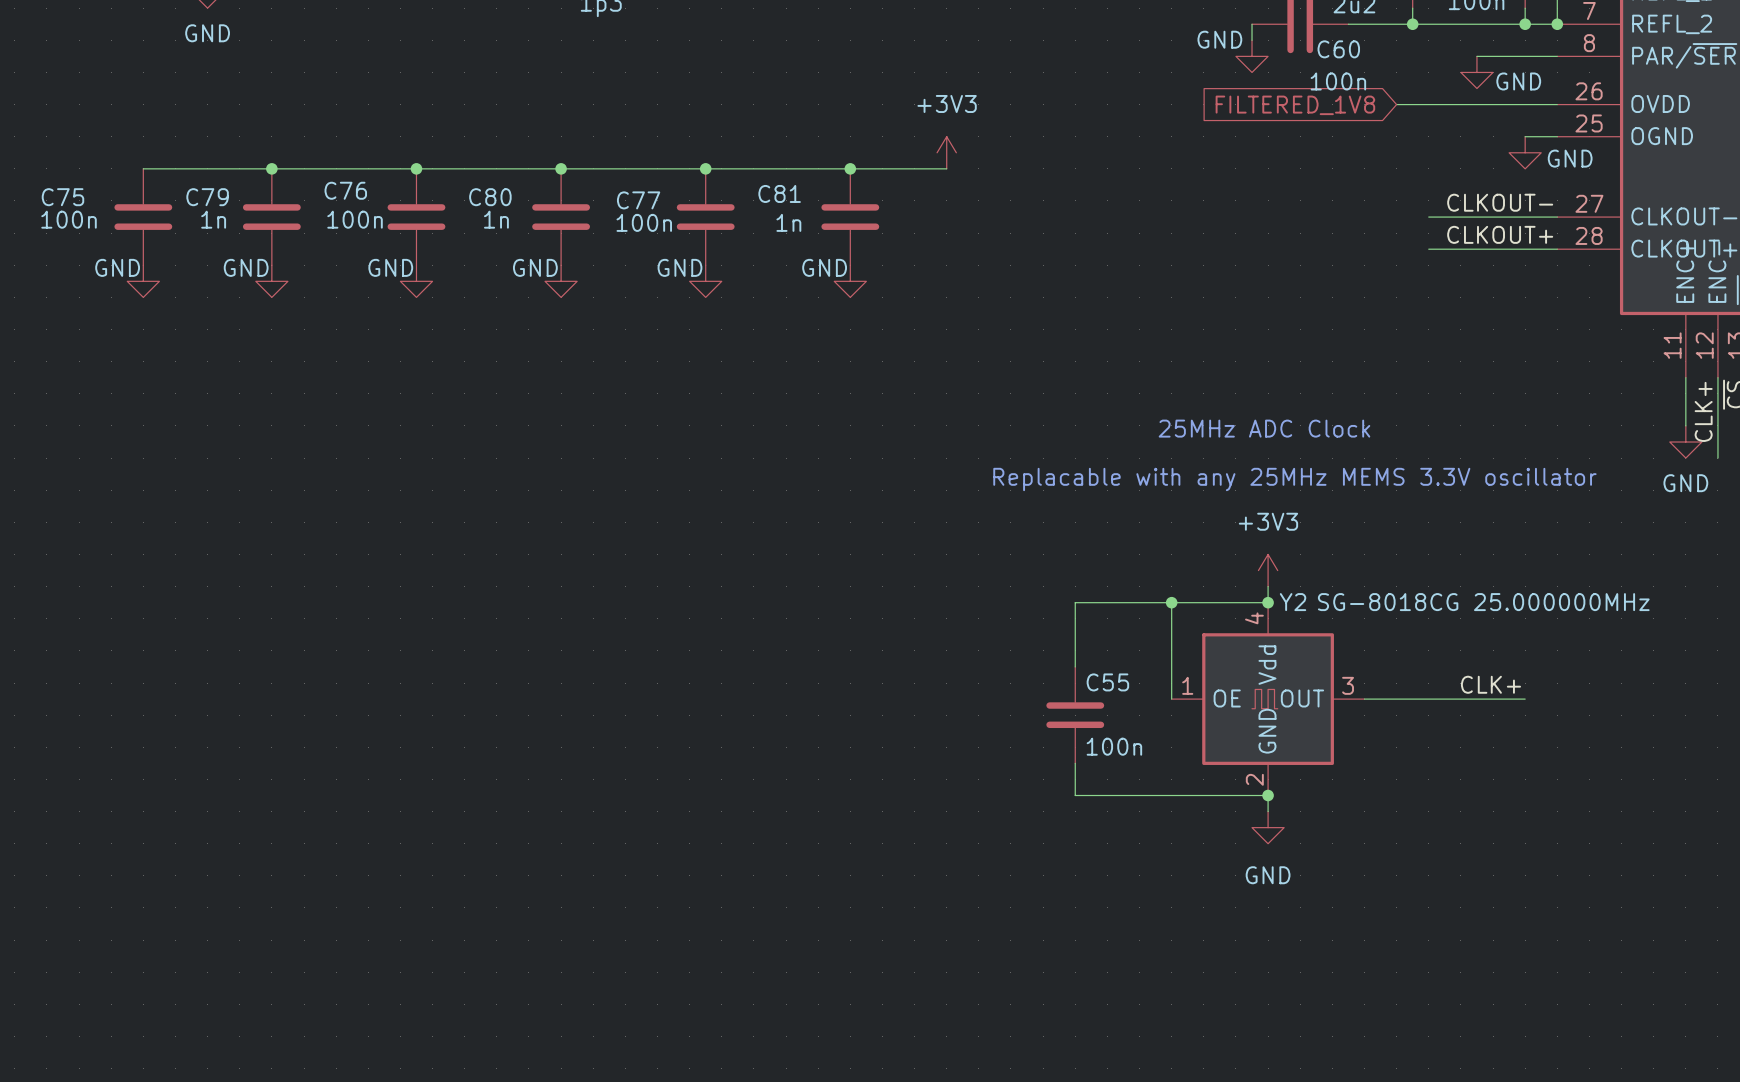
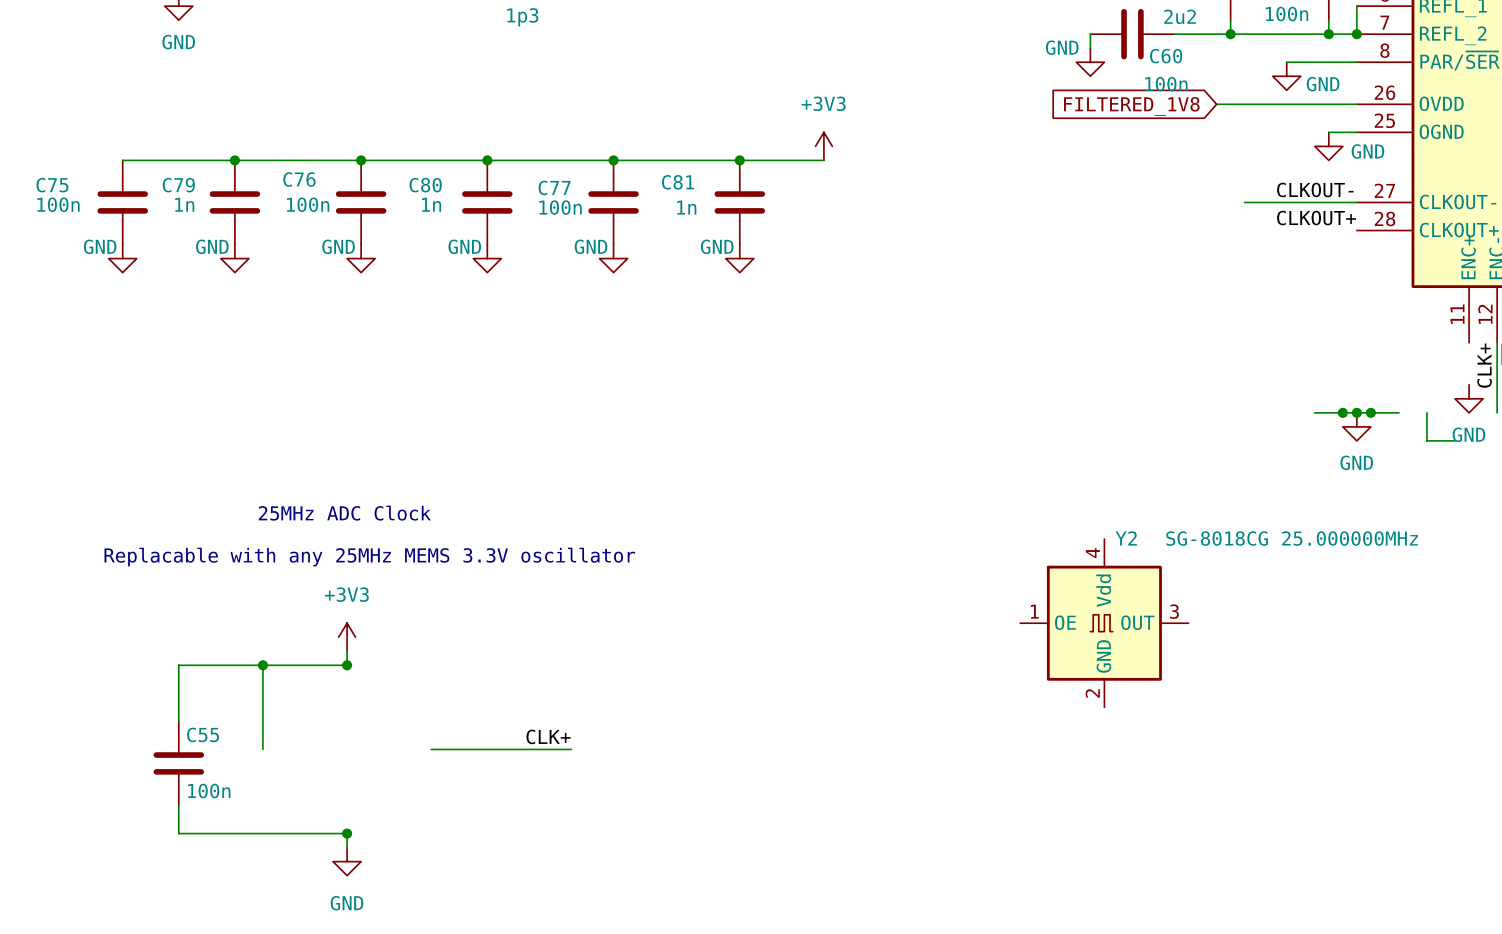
wire: (1428, 249) (1557, 249) -> none
wire: (1685, 377) (1685, 425) -> none
text: 25MHz ADC Clock (1264, 428) -> none
wire: none -> (1314, 412) (1398, 412)
junction: none -> (1342, 412)
junction: none -> (1356, 412)
junction: none -> (1370, 412)
wire: none -> (1426, 412) (1426, 440) (1455, 440)
power symbol: none -> GND (1356, 426)
text: Replacable with any 25MHz MEMS 3.3V oscillator (1294, 479) -> none
power symbol: +3V3 (1268, 570) -> none
text: none -> 25MHz ADC Clock (344, 513)
wire: (1268, 586) (1268, 602) (1075, 602) (1075, 666) -> none
wire: (1171, 602) (1171, 699) -> none
junction: (1171, 602) -> none
junction: (1268, 602) -> none
text: none -> Replacable with any 25MHz MEMS 3.3V oscillator (369, 557)
label: CLK+ (1490, 684) -> none
wire: (1364, 699) (1525, 699) -> none
power symbol: none -> +3V3 (347, 637)
C55 position: (1075, 715) -> (178, 763)
wire: none -> (347, 651) (347, 665) (178, 665) (178, 721)
wire: none -> (262, 665) (262, 749)
junction: none -> (262, 665)
junction: none -> (347, 665)
wire: (1075, 763) (1075, 795) (1268, 795) (1268, 811) -> none
junction: (1268, 795) -> none
power symbol: GND (1268, 827) -> none
label: none -> CLK+ (548, 736)
wire: none -> (431, 749) (571, 749)
wire: none -> (178, 805) (178, 833) (347, 833) (347, 847)
junction: none -> (347, 833)
power symbol: none -> GND (347, 861)

